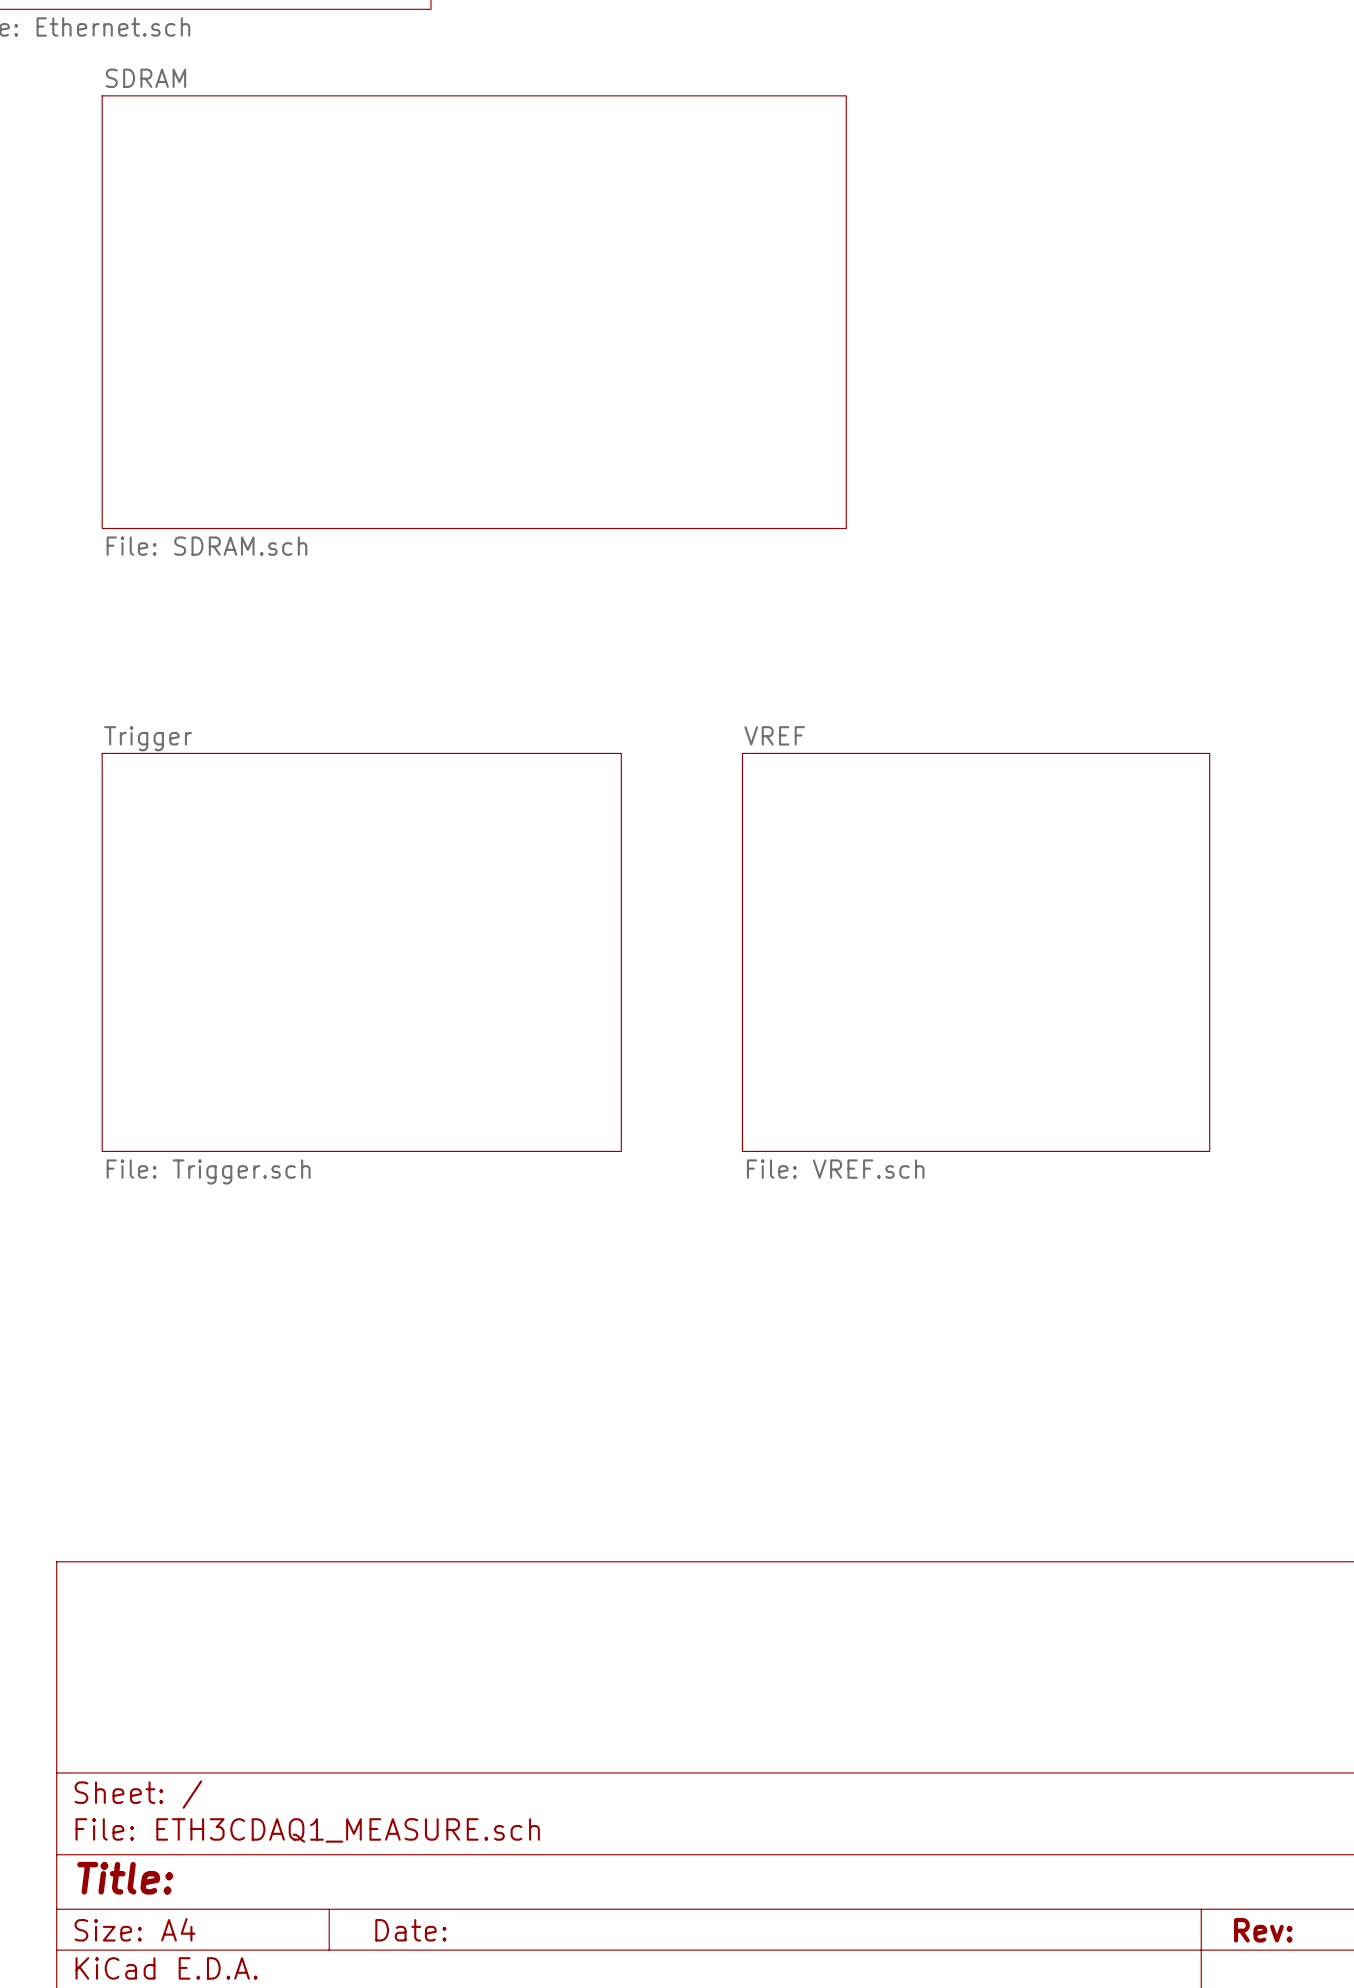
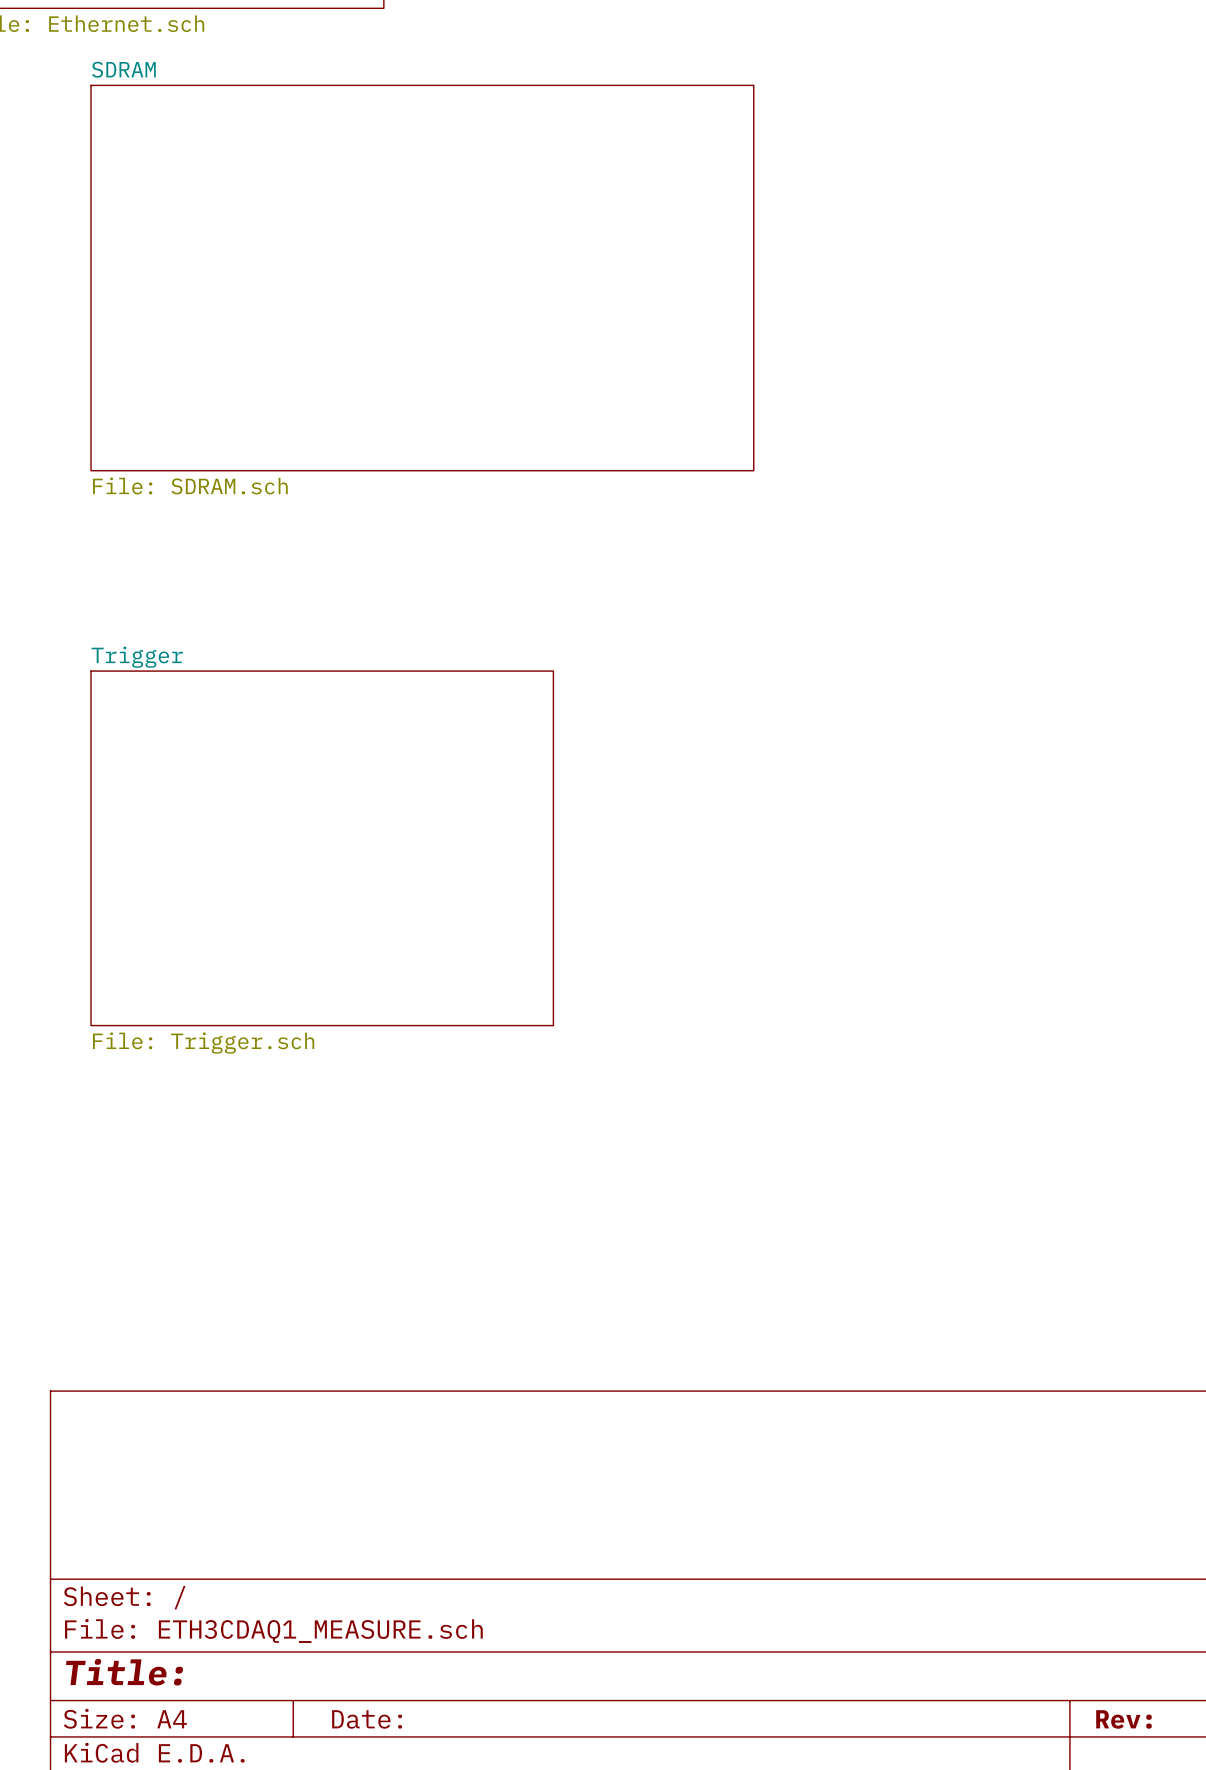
sheet VREF: File: VREF.sch (976, 952) -> none

